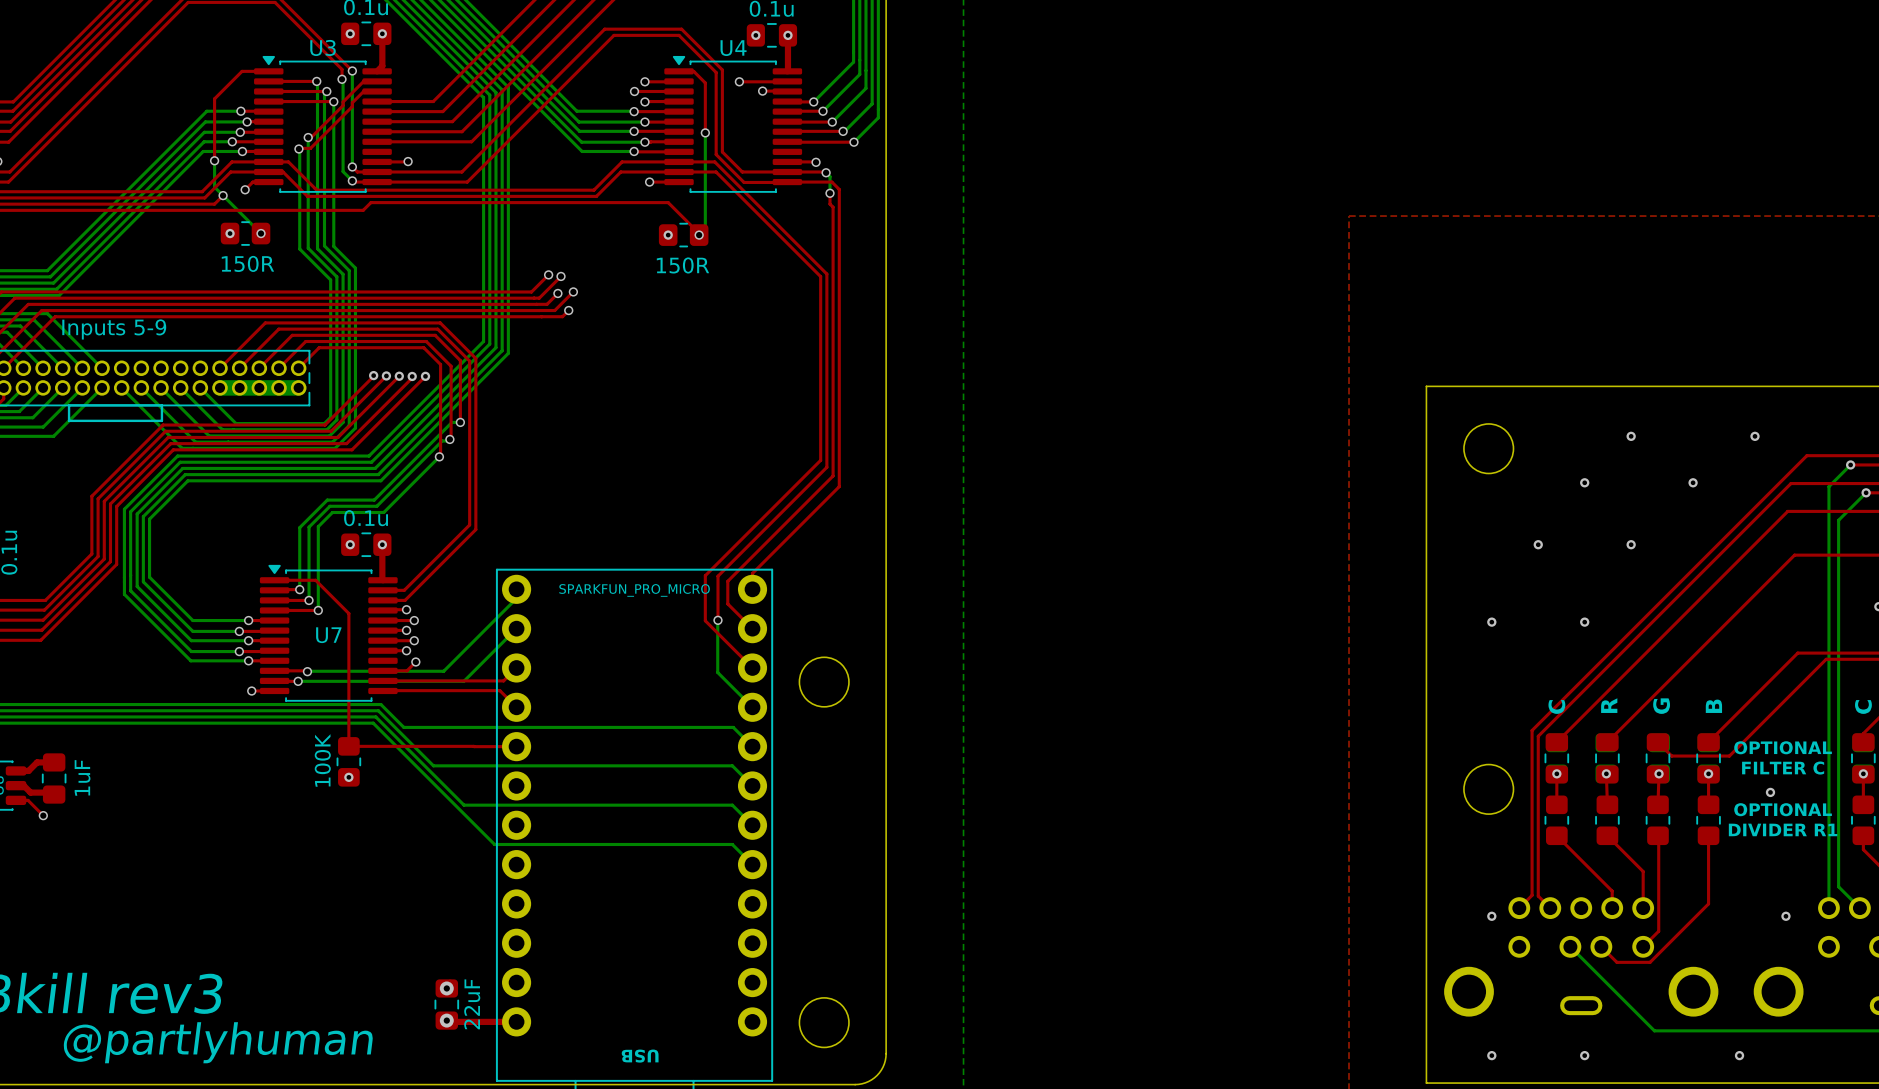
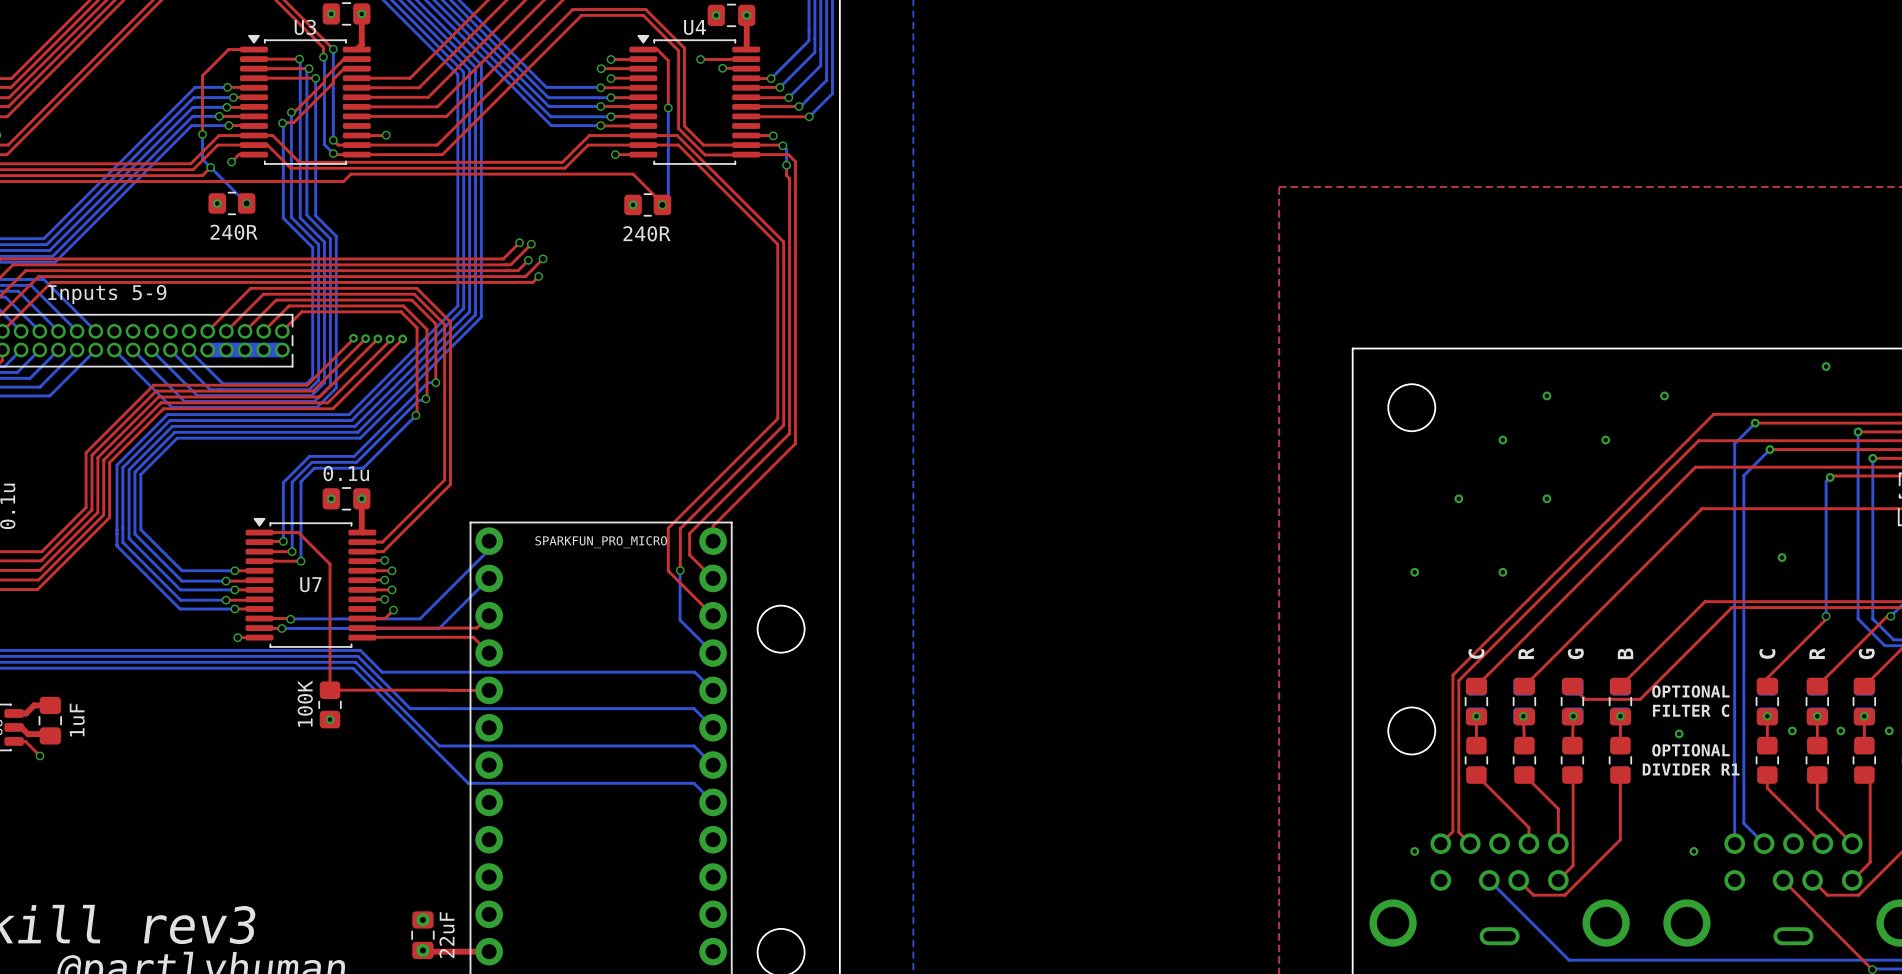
part value: 150R (247, 263) -> 240R (234, 232)
part value: 150R (682, 265) -> 240R (647, 233)
line: (69, 405) (161, 405) (161, 420) (69, 420) (69, 405) -> none

